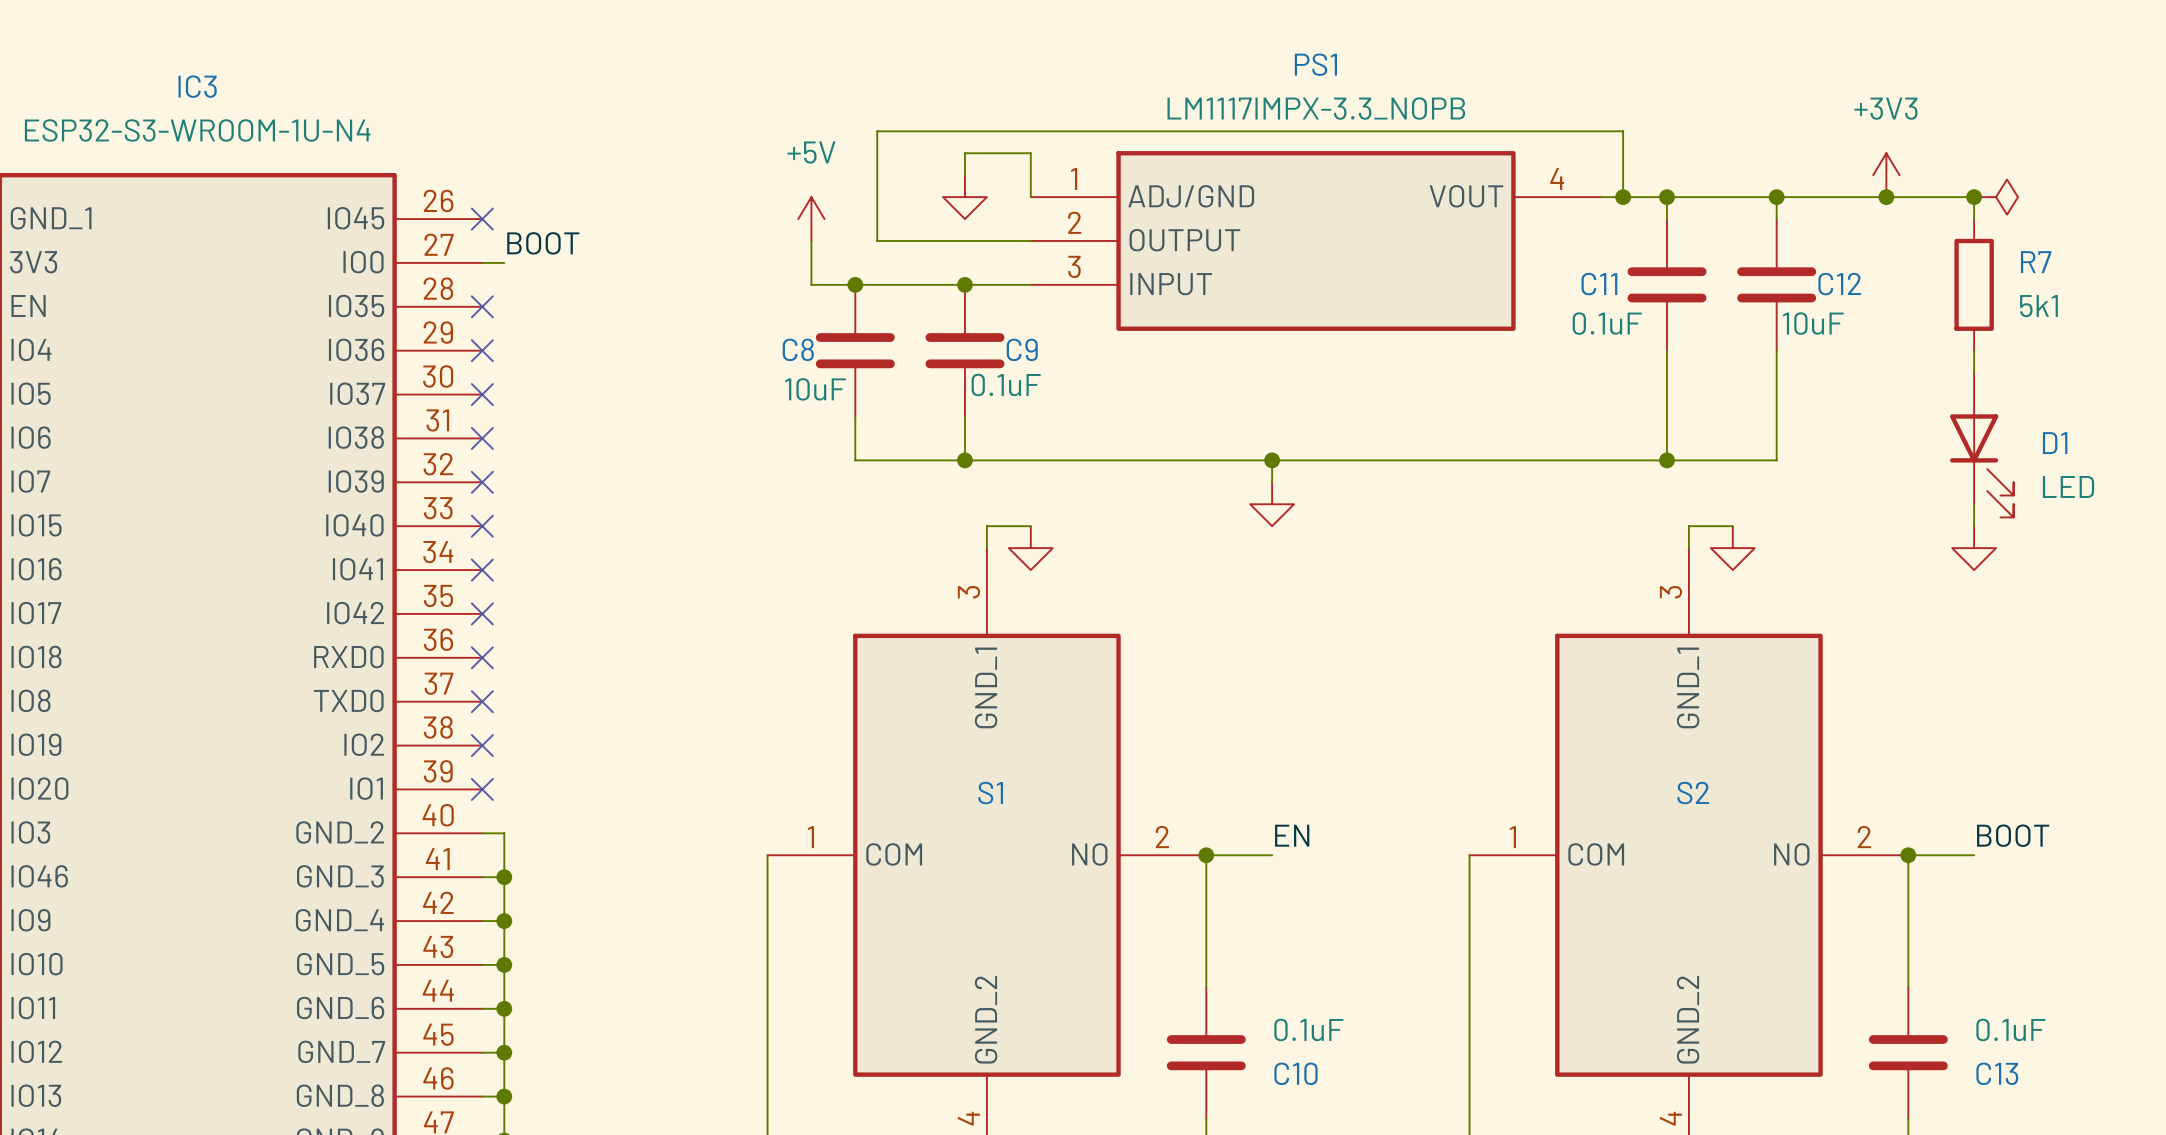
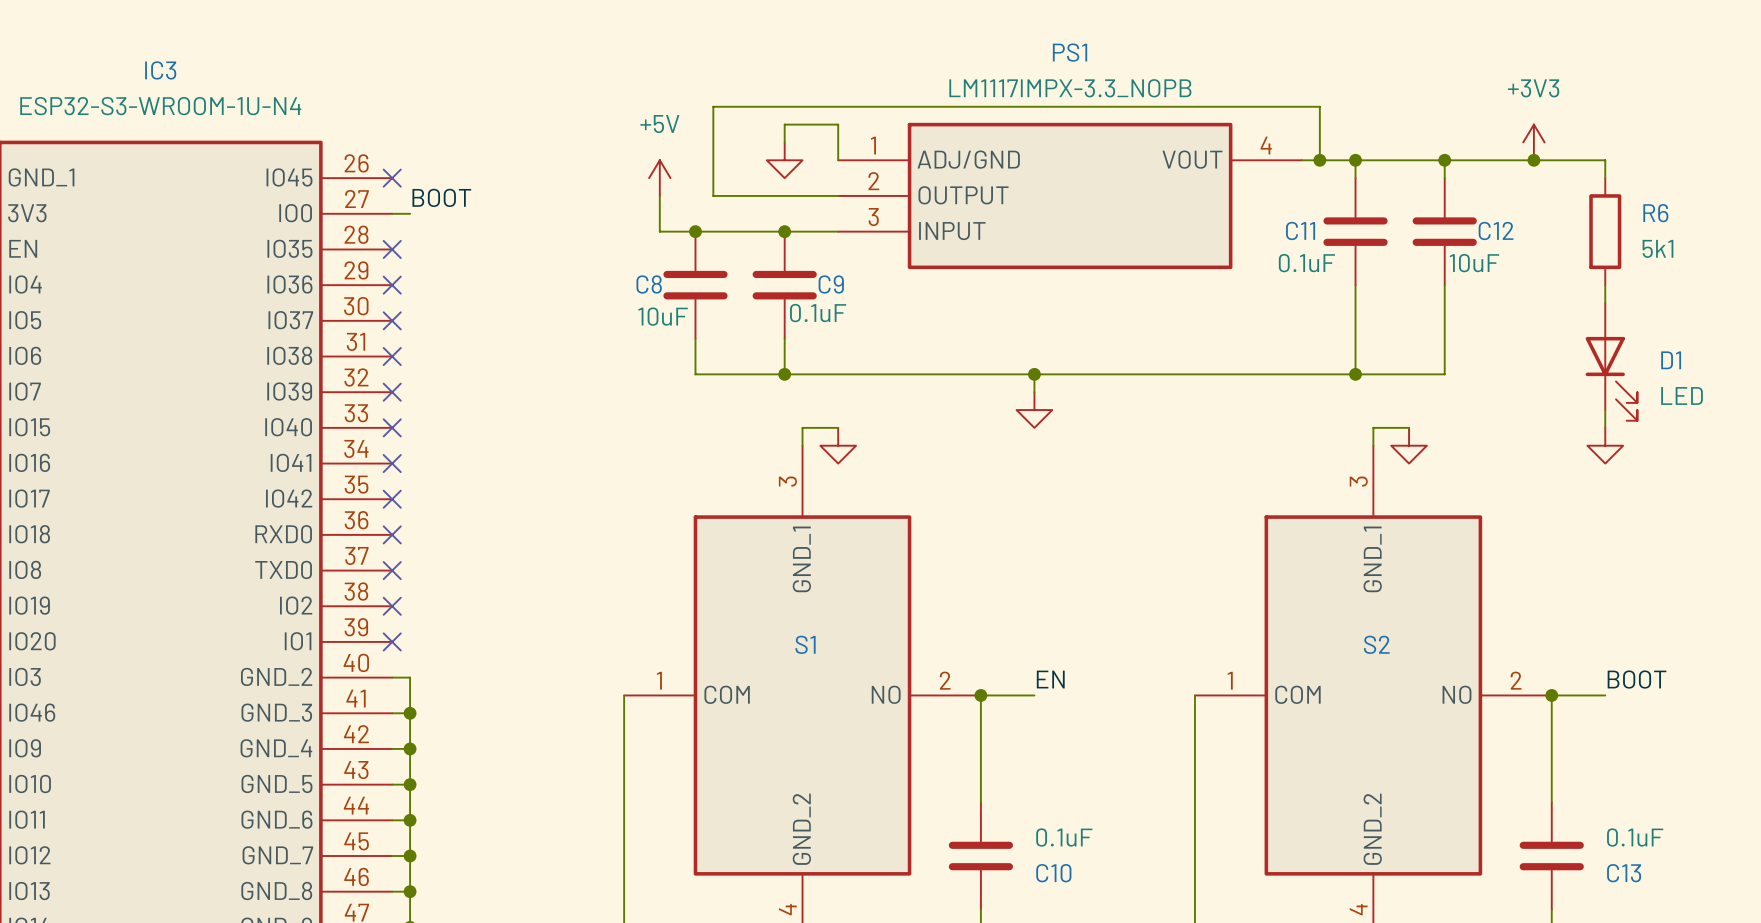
junction: (1974, 197) -> none
power symbol: (1996, 197) -> none
R7 name: R7 (2036, 262) -> R6 (1655, 213)

